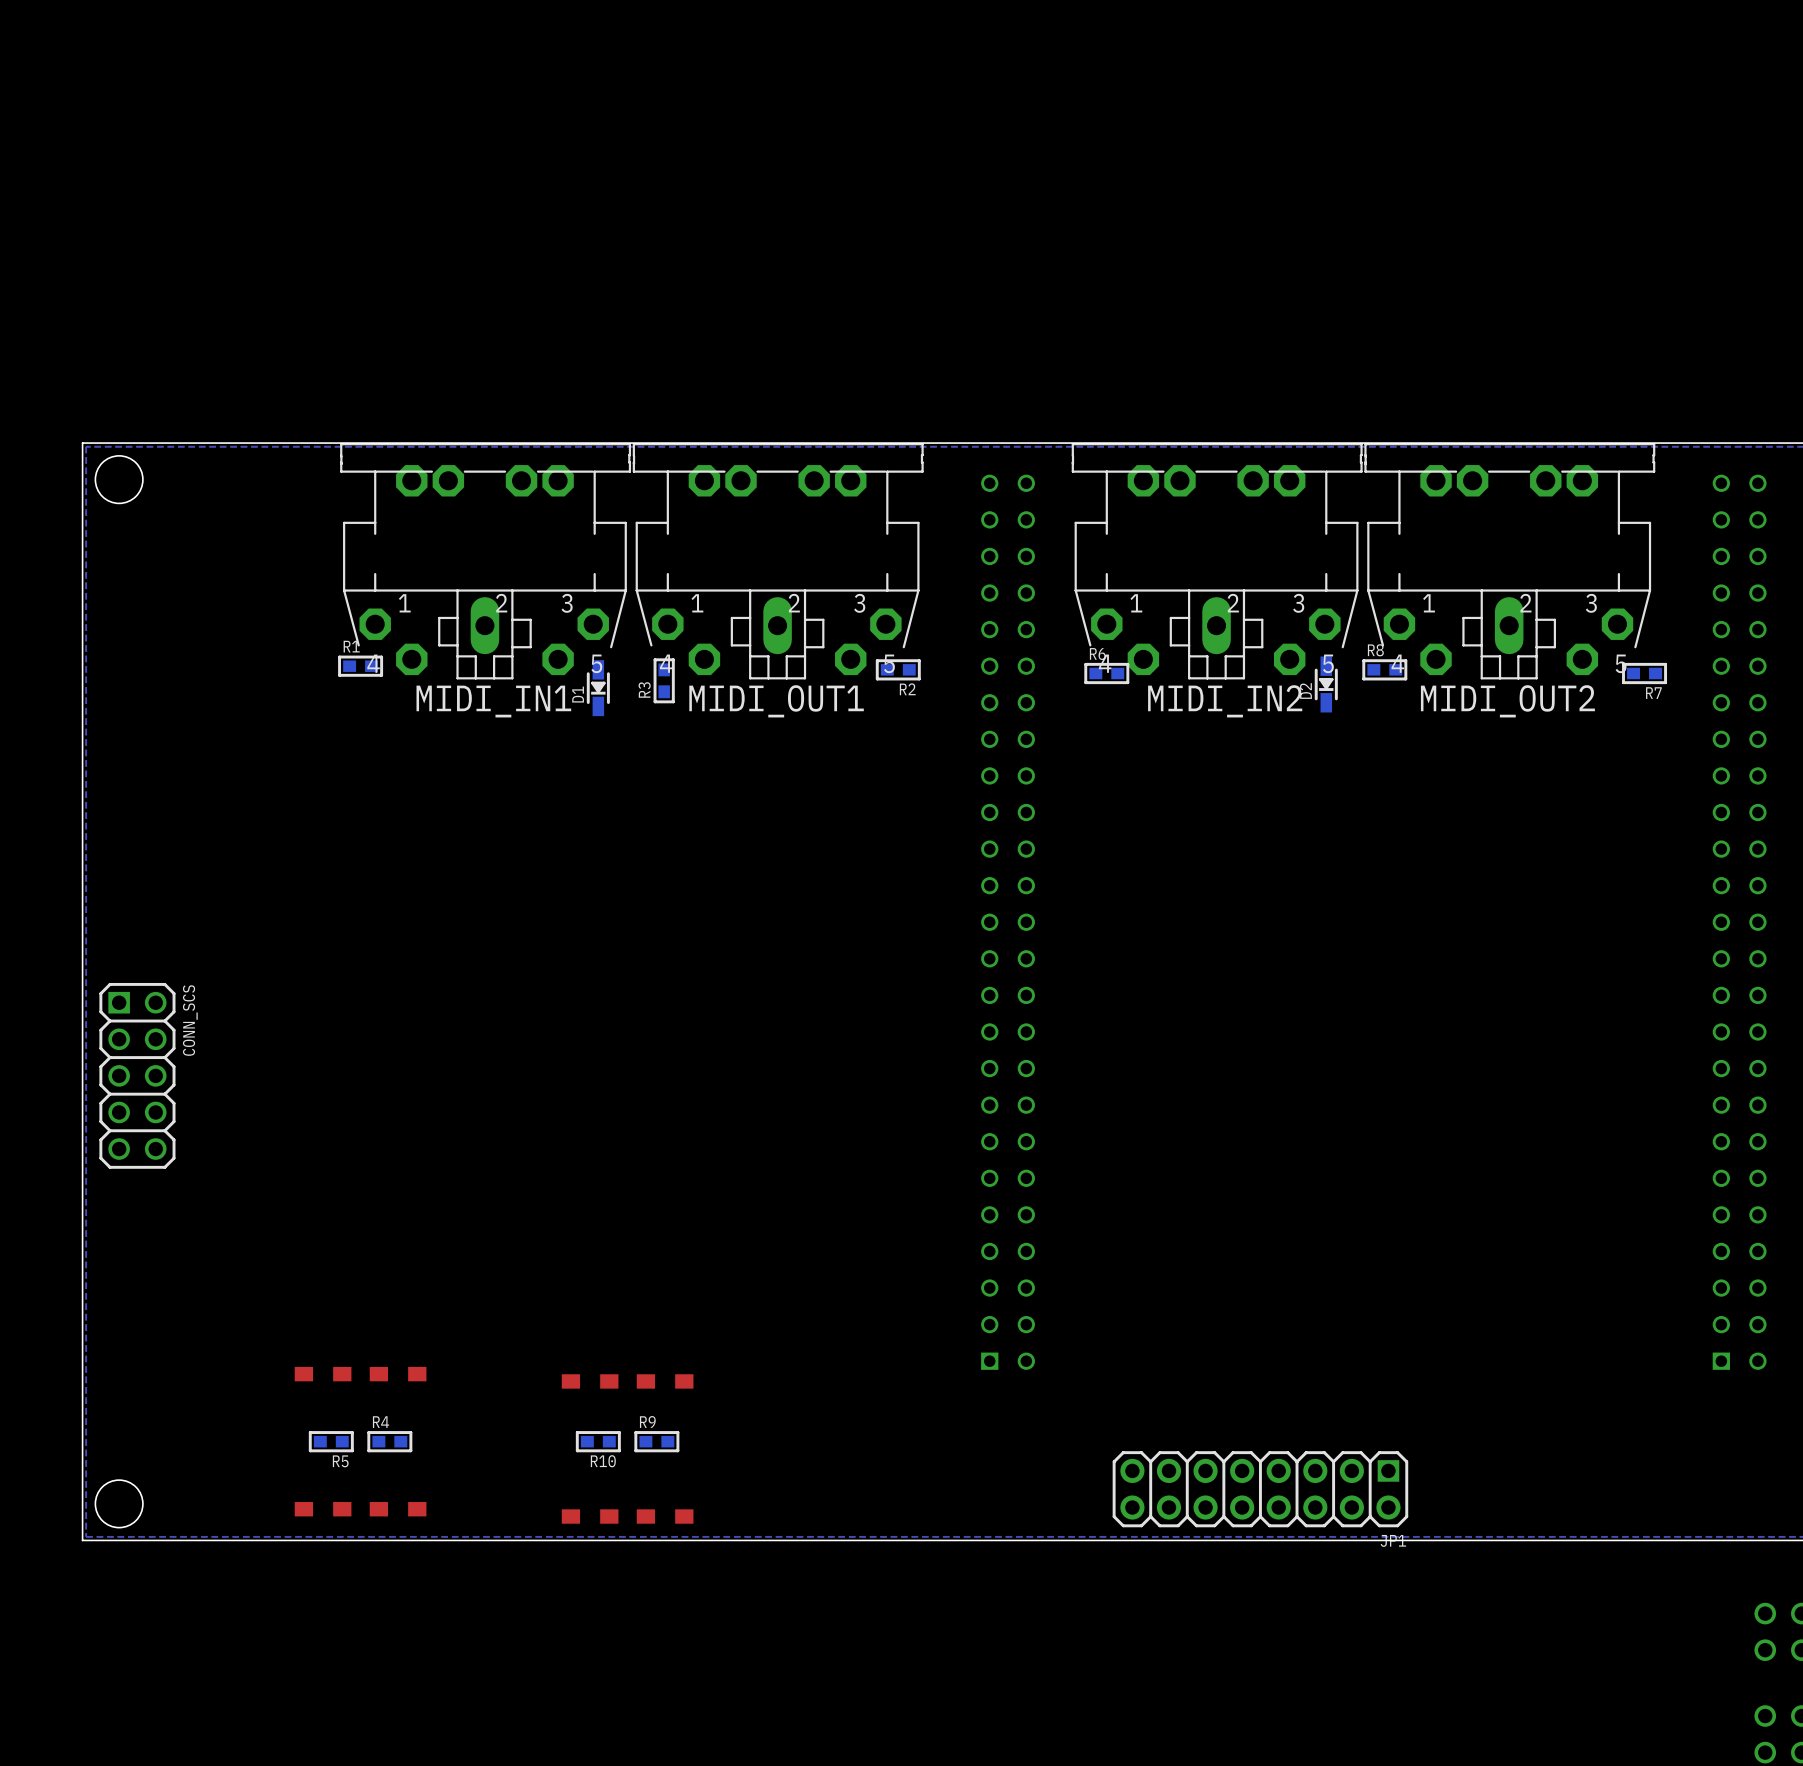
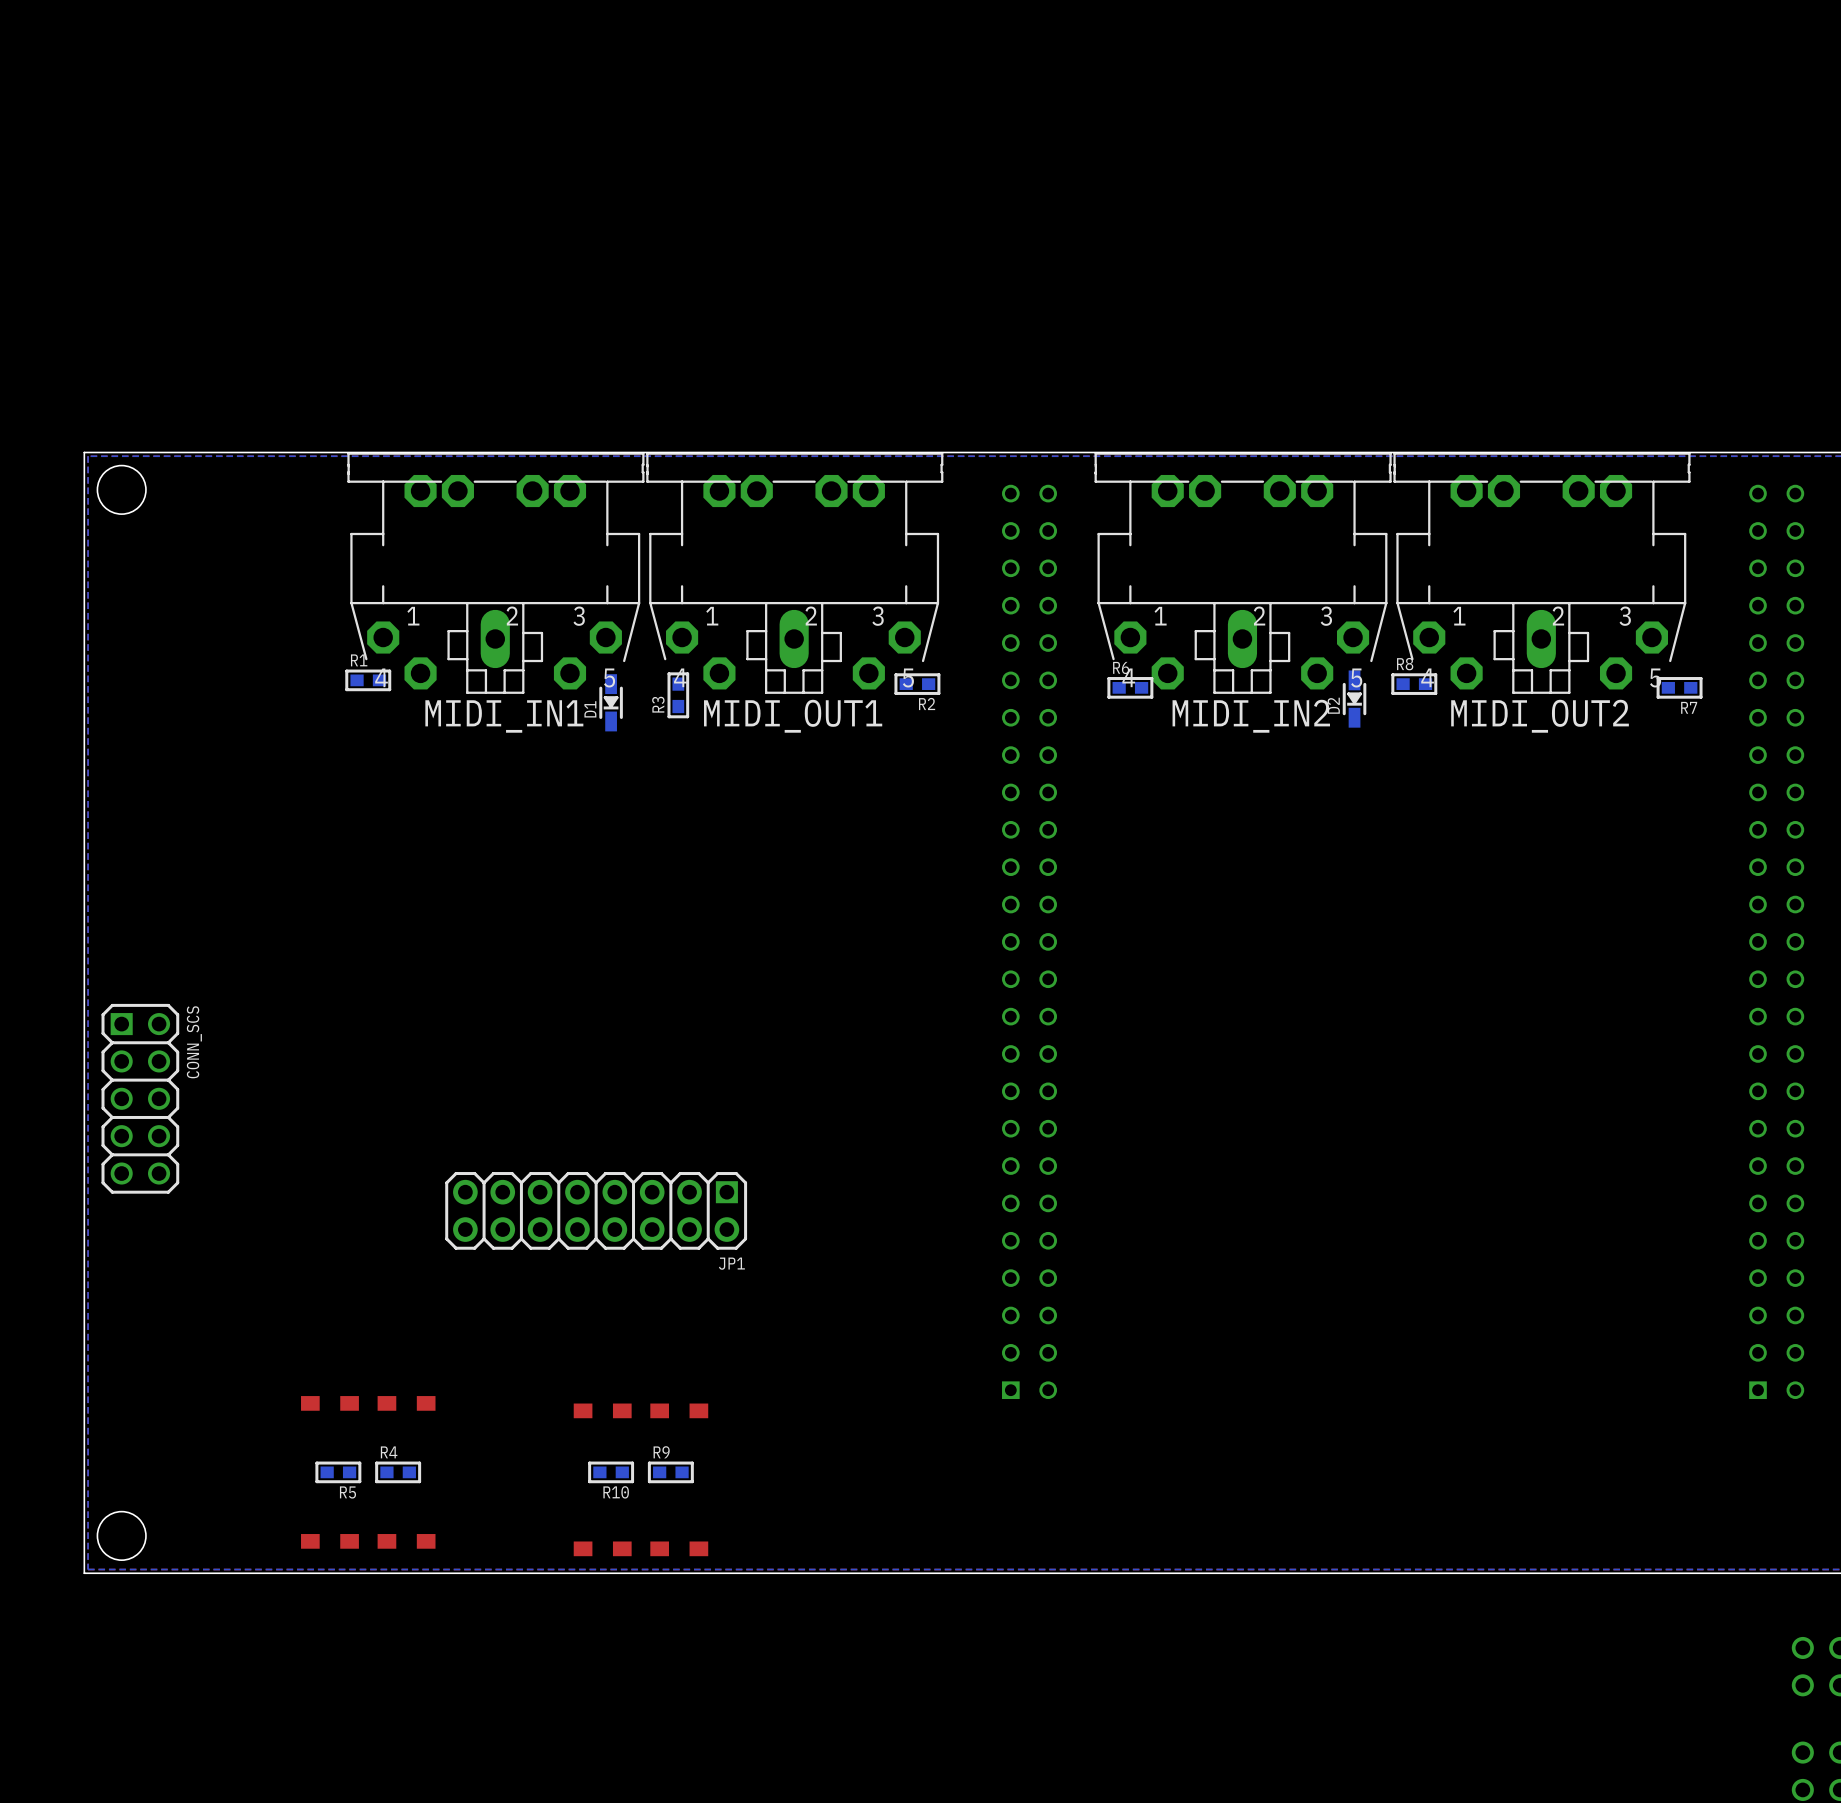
JP1 position: (1260, 1489) -> (596, 1210)

